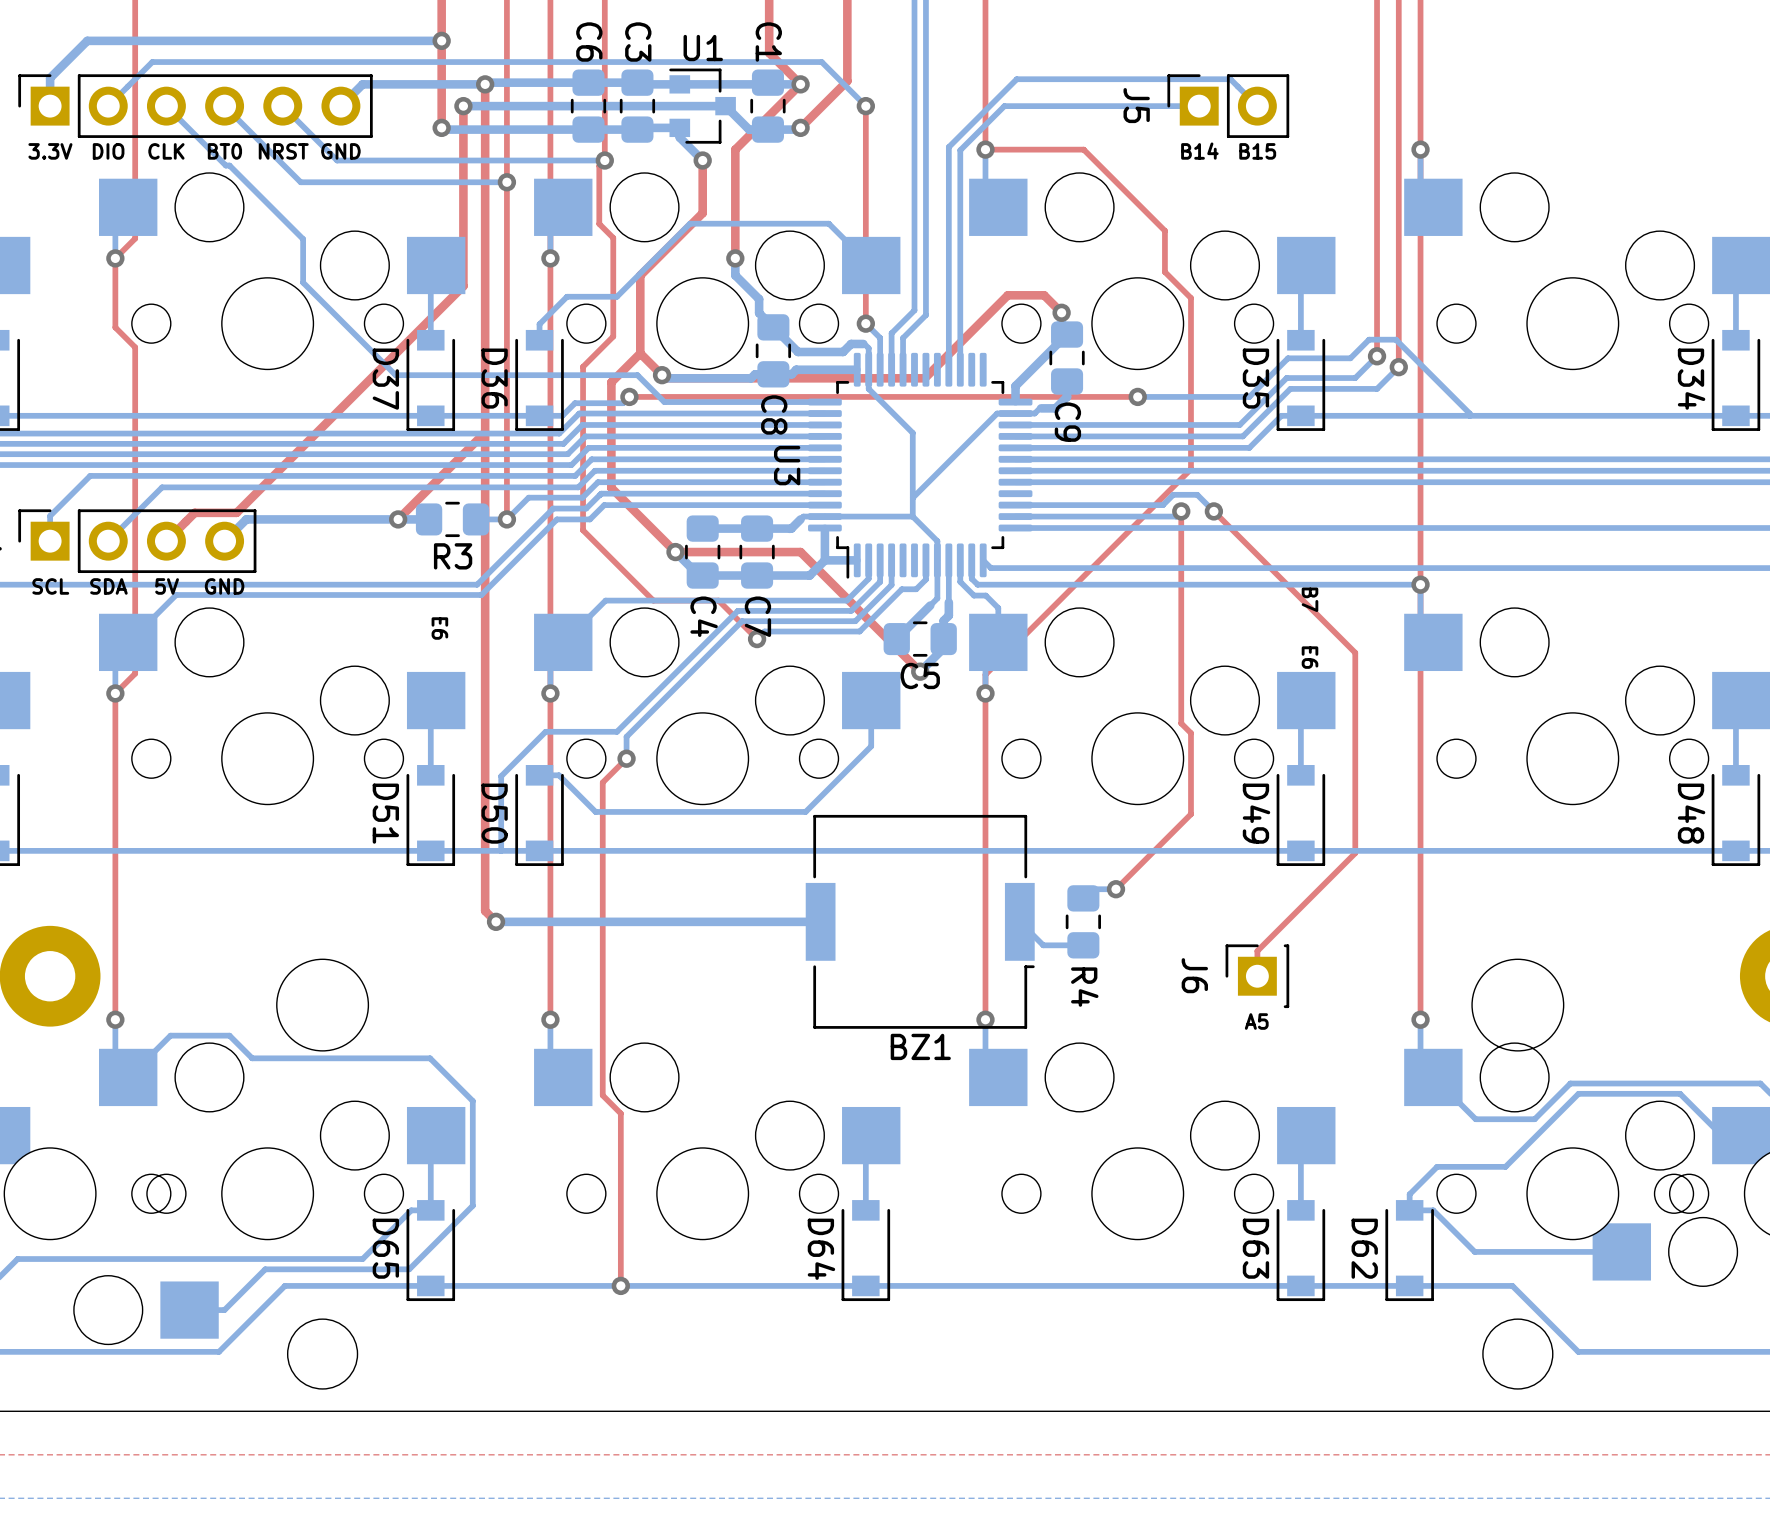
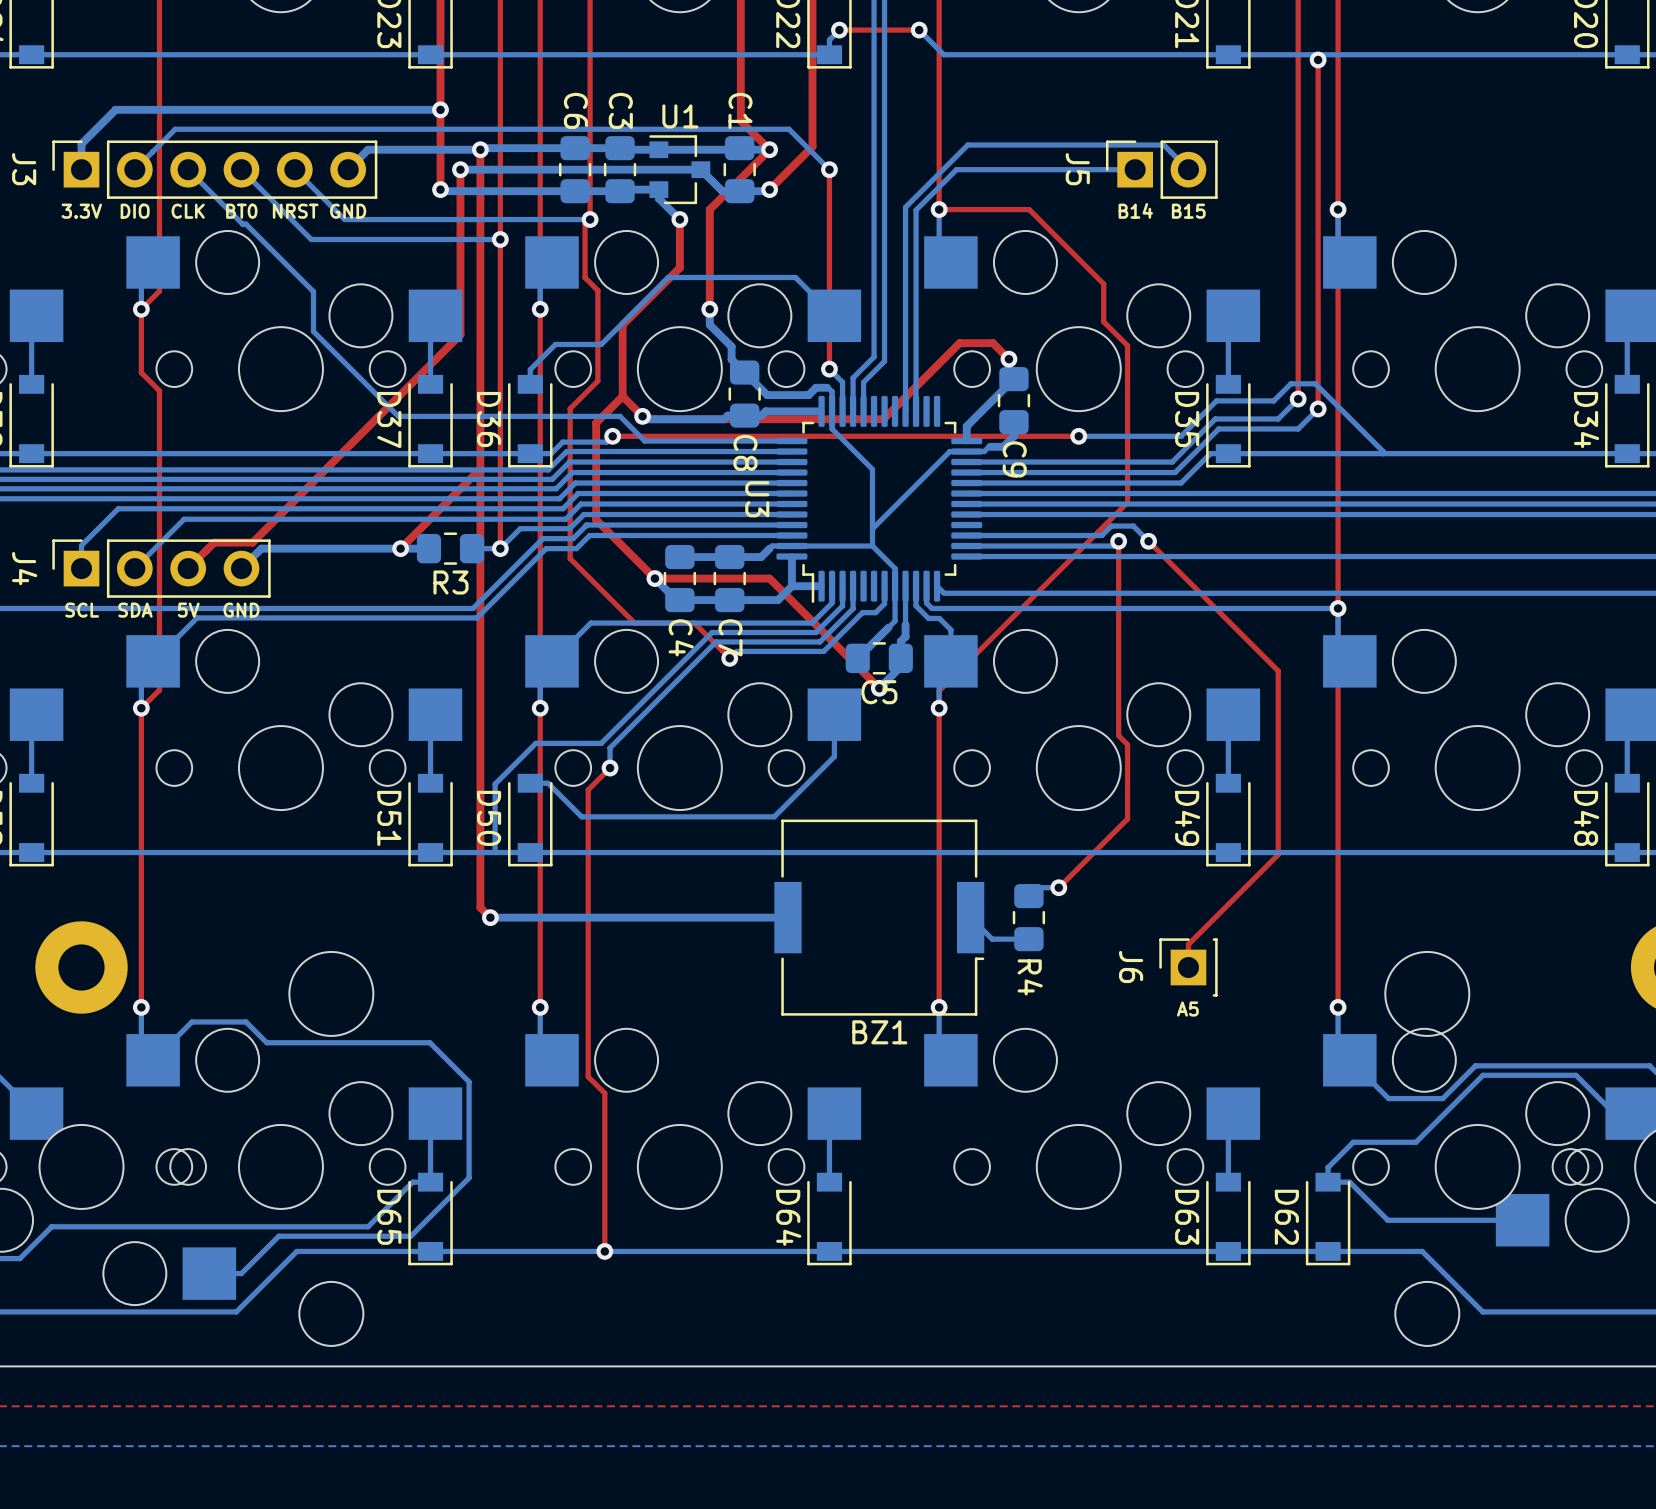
text: B7 (1309, 599) -> none
text: E6 (439, 628) -> none
text: E6 (1309, 657) -> none

